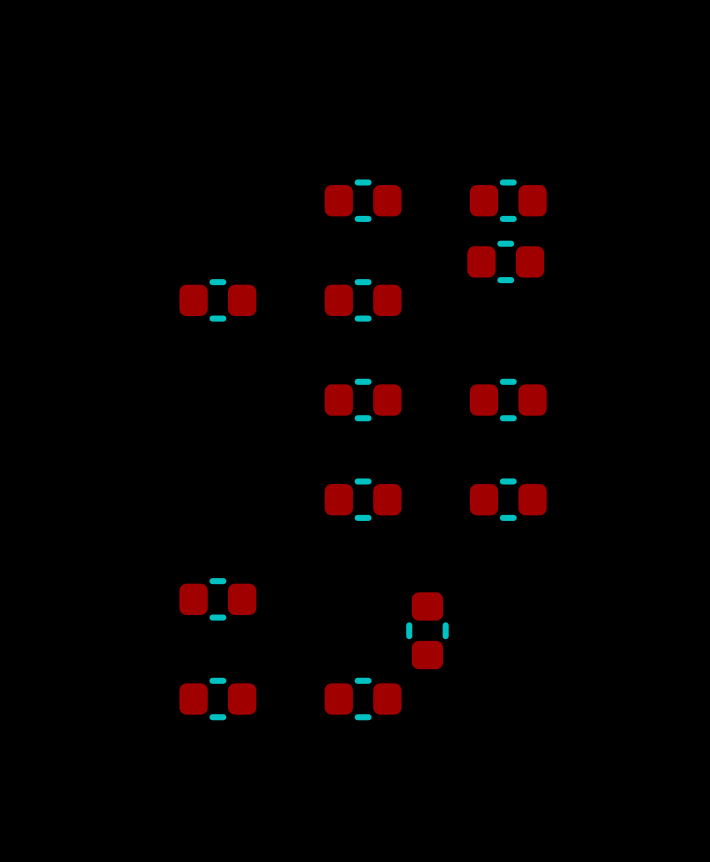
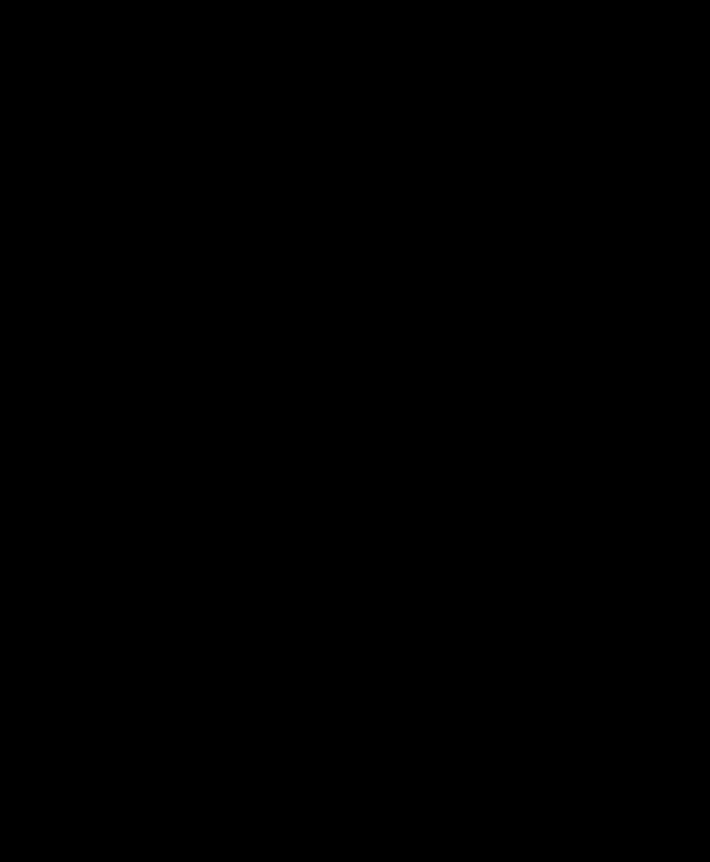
part: (363, 200) -> none
part: (508, 200) -> none
part: (505, 261) -> none
part: (217, 300) -> none
part: (363, 300) -> none
part: (363, 400) -> none
part: (508, 400) -> none
part: (363, 499) -> none
part: (508, 499) -> none
part: (217, 599) -> none
part: (427, 630) -> none
part: (217, 699) -> none
part: (363, 699) -> none

